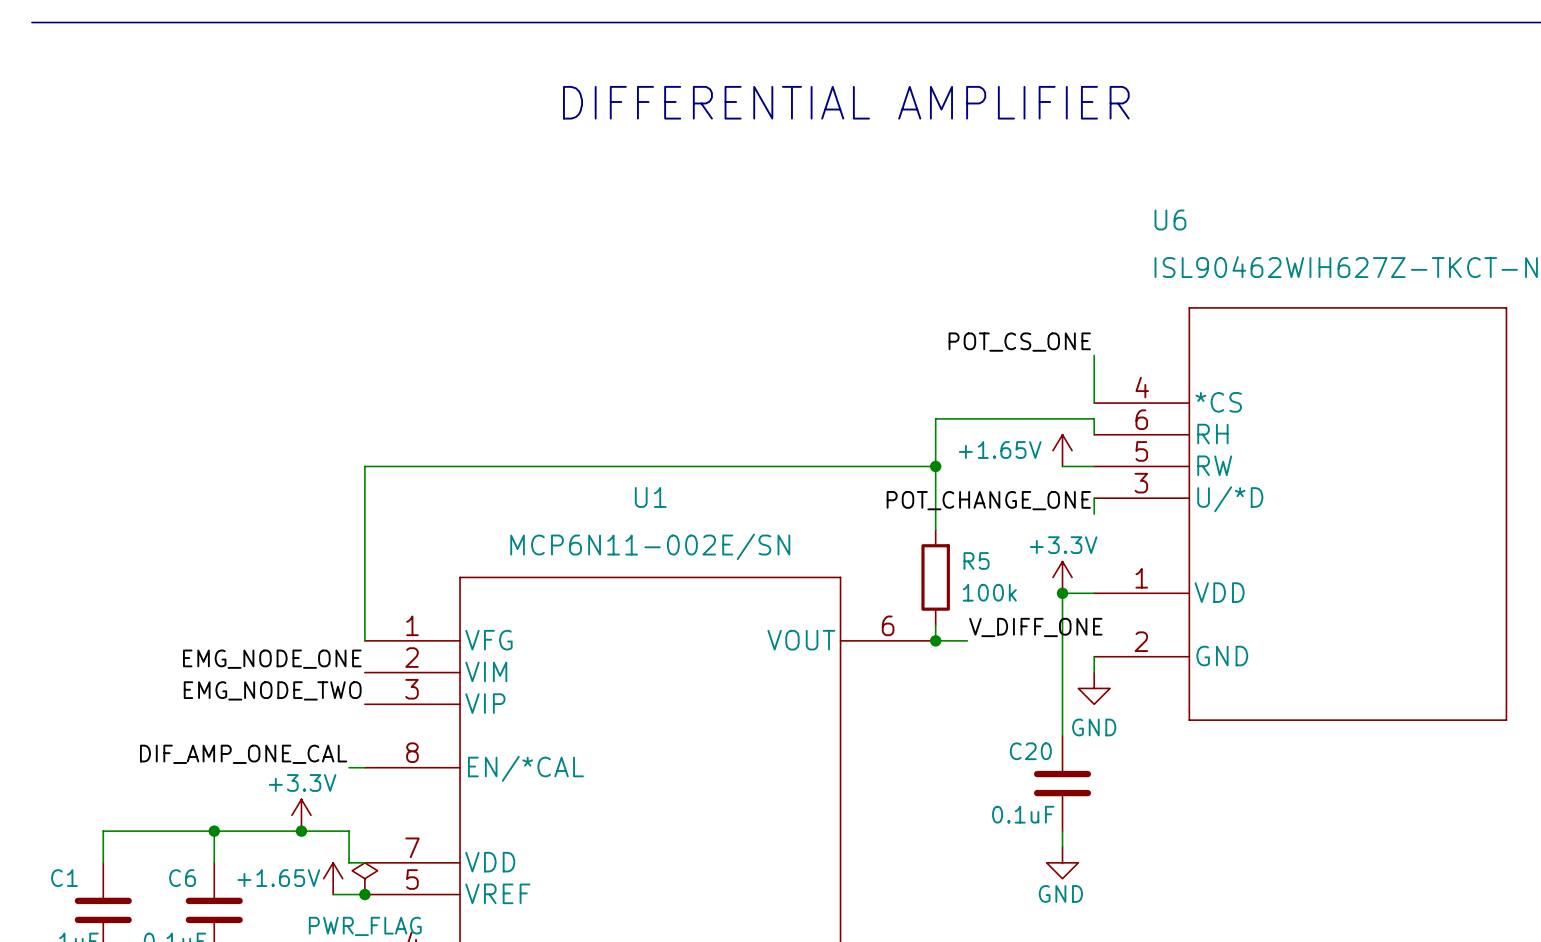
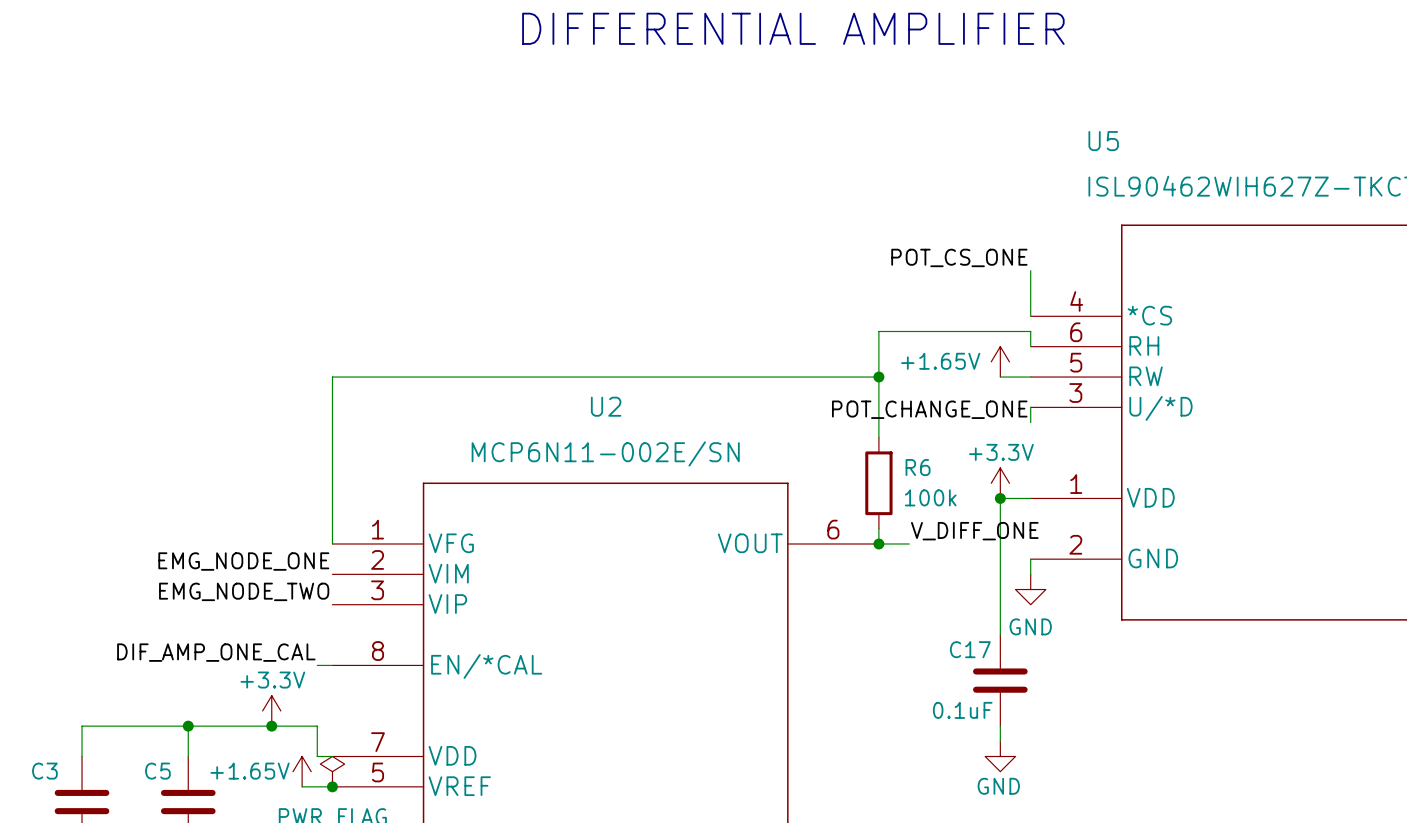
U6 name: U6 (1170, 220) -> U5 (1103, 141)
U1 name: U1 (650, 497) -> U2 (606, 406)
R5 name: R5 (976, 561) -> R6 (918, 467)
C20 name: C20 (1030, 751) -> C17 (970, 649)
C1 name: C1 (64, 878) -> C3 (44, 771)
C6 name: C6 (182, 878) -> C5 (157, 771)

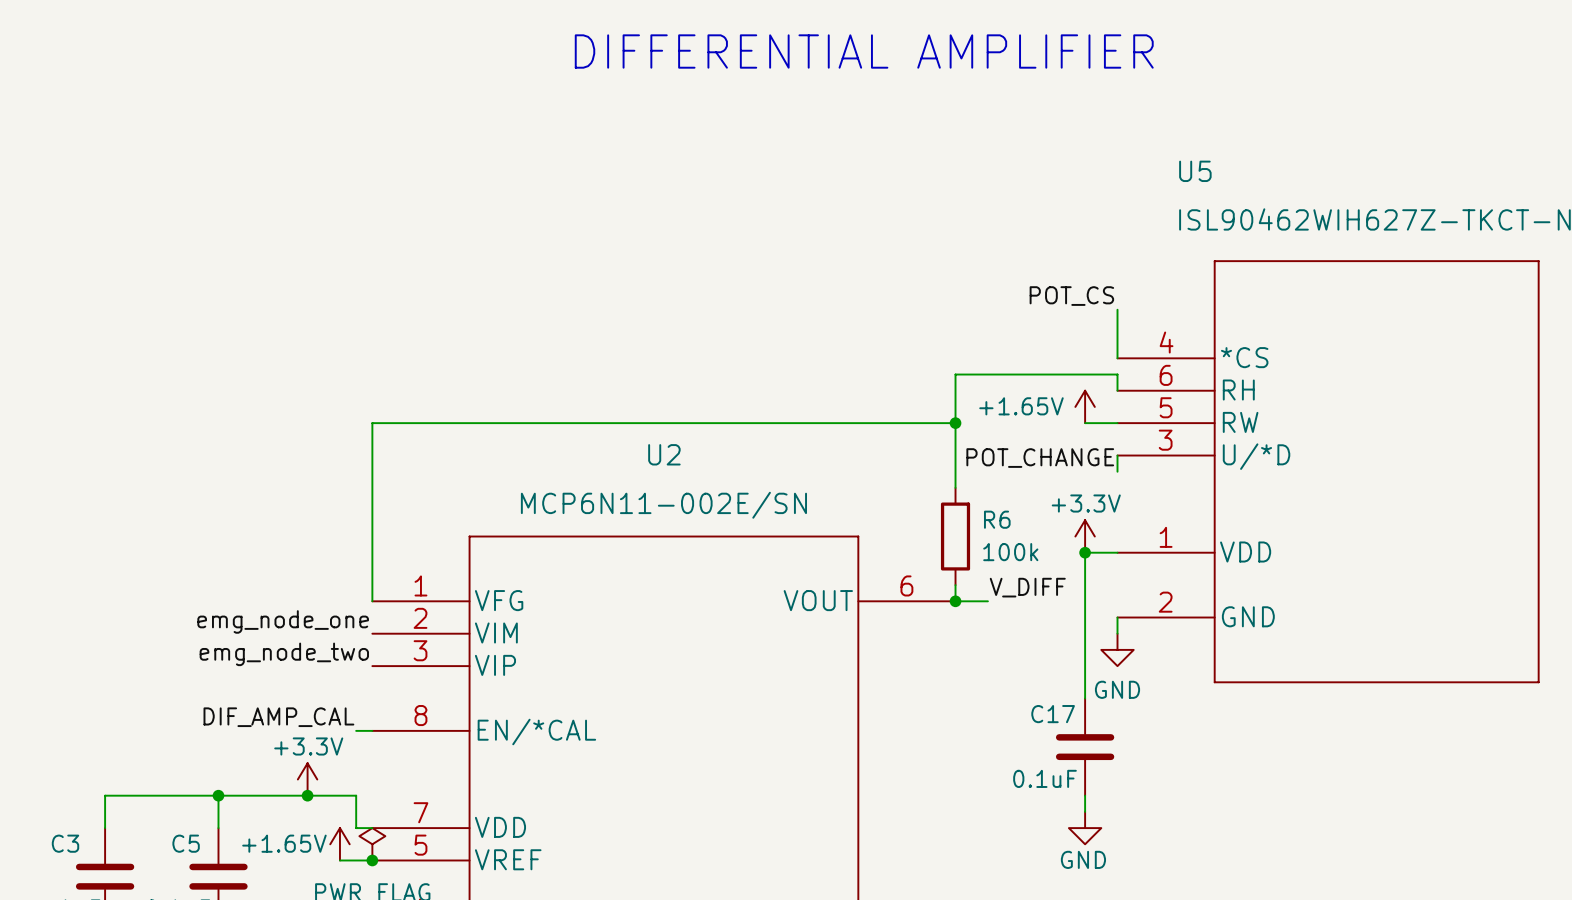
label: POT_CS_ONE (959, 257) -> POT_CS (1071, 296)
label: POT_CHANGE_ONE (929, 409) -> POT_CHANGE (1040, 458)
label: V_DIFF_ONE (974, 531) -> V_DIFF (1027, 587)
label: EMG_NODE_ONE (243, 561) -> emg_node_one (283, 621)
label: EMG_NODE_TWO (244, 591) -> emg_node_two (284, 654)
label: DIF_AMP_ONE_CAL (216, 652) -> DIF_AMP_CAL (278, 717)

